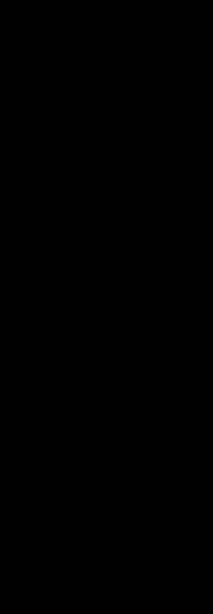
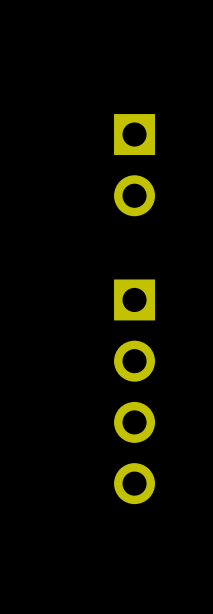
part: none -> (134, 165)
part: none -> (134, 391)

